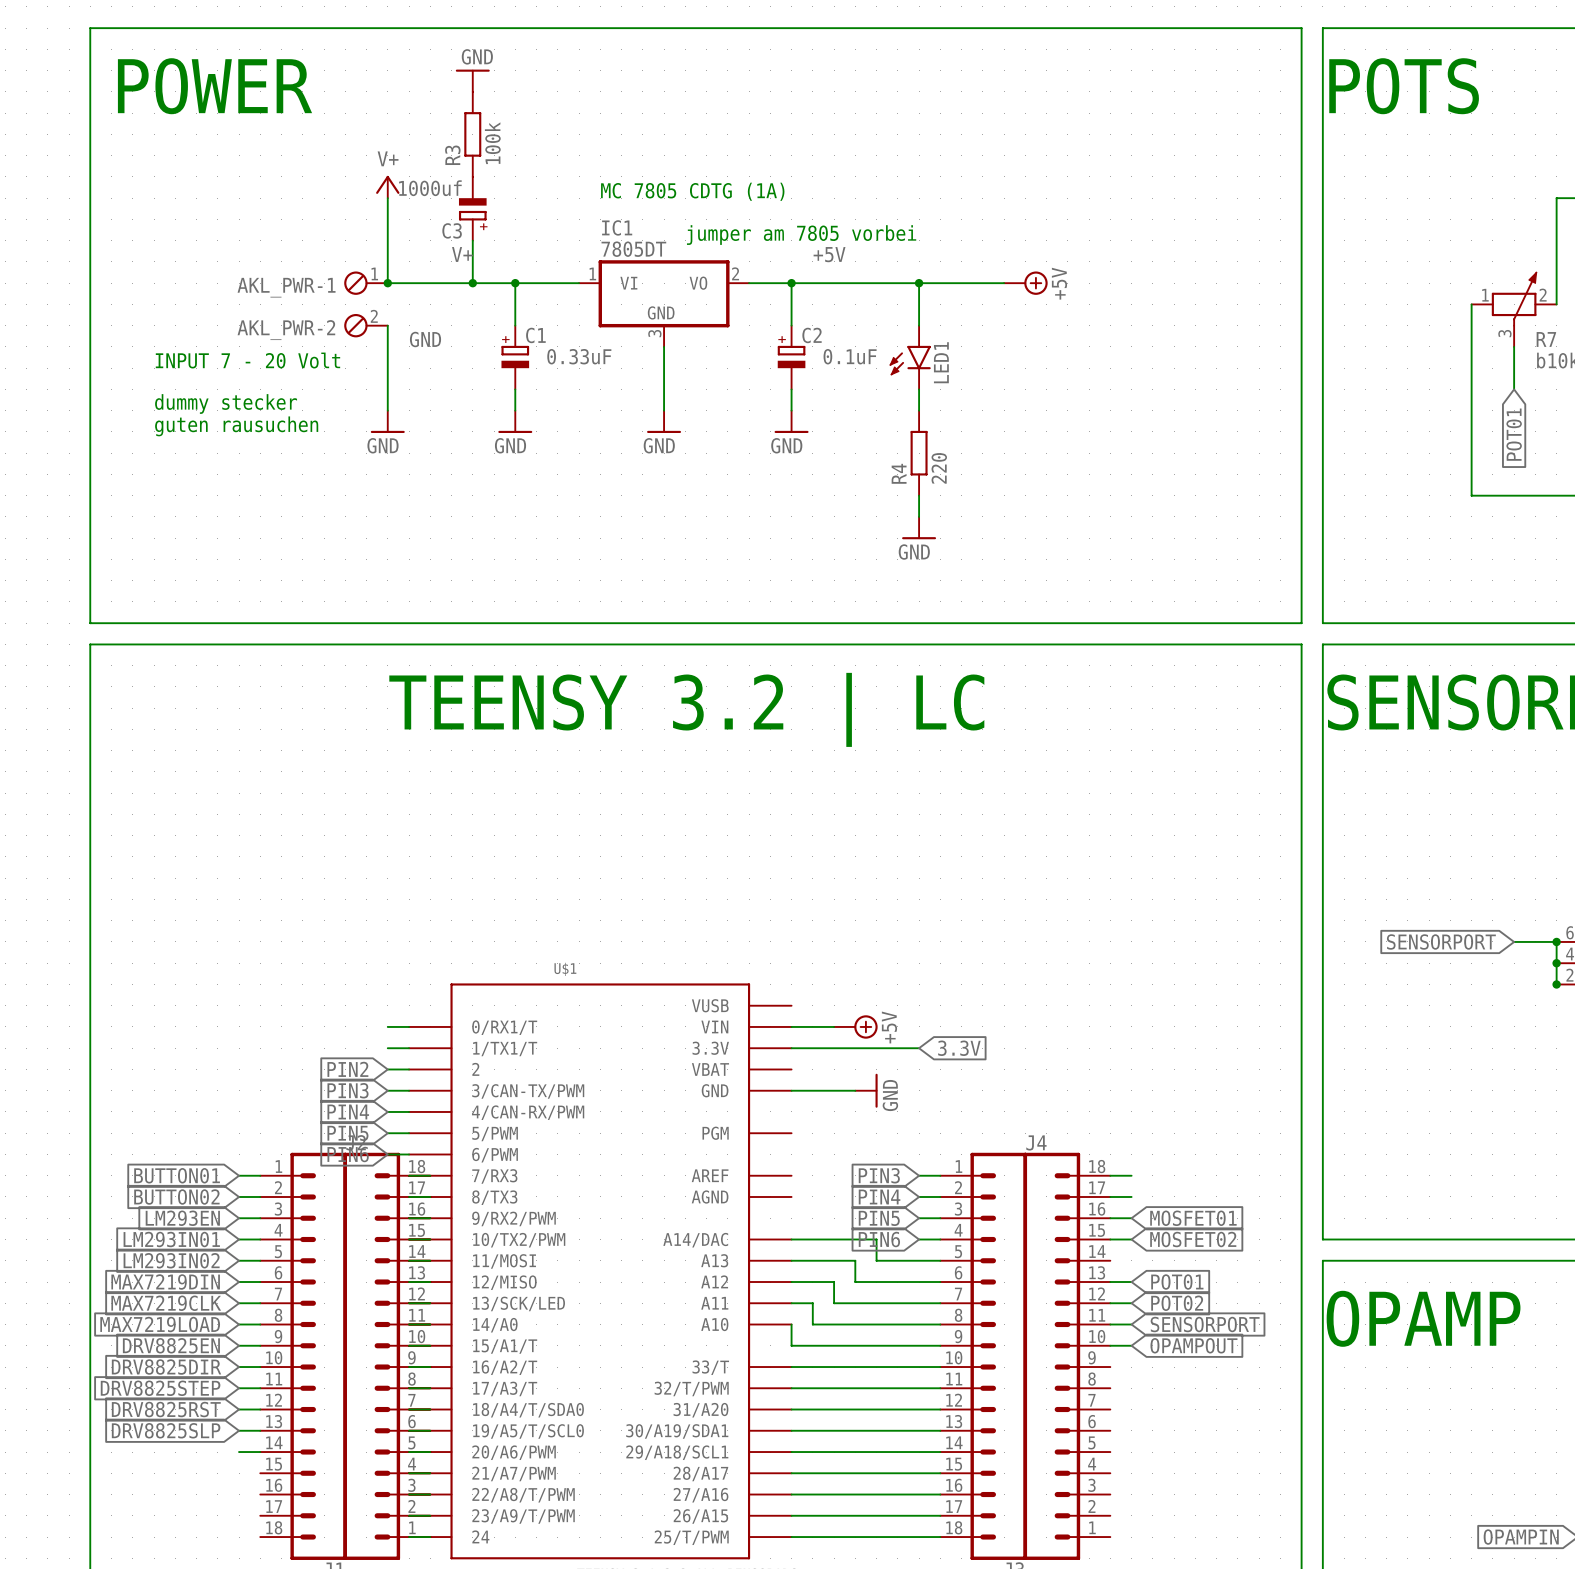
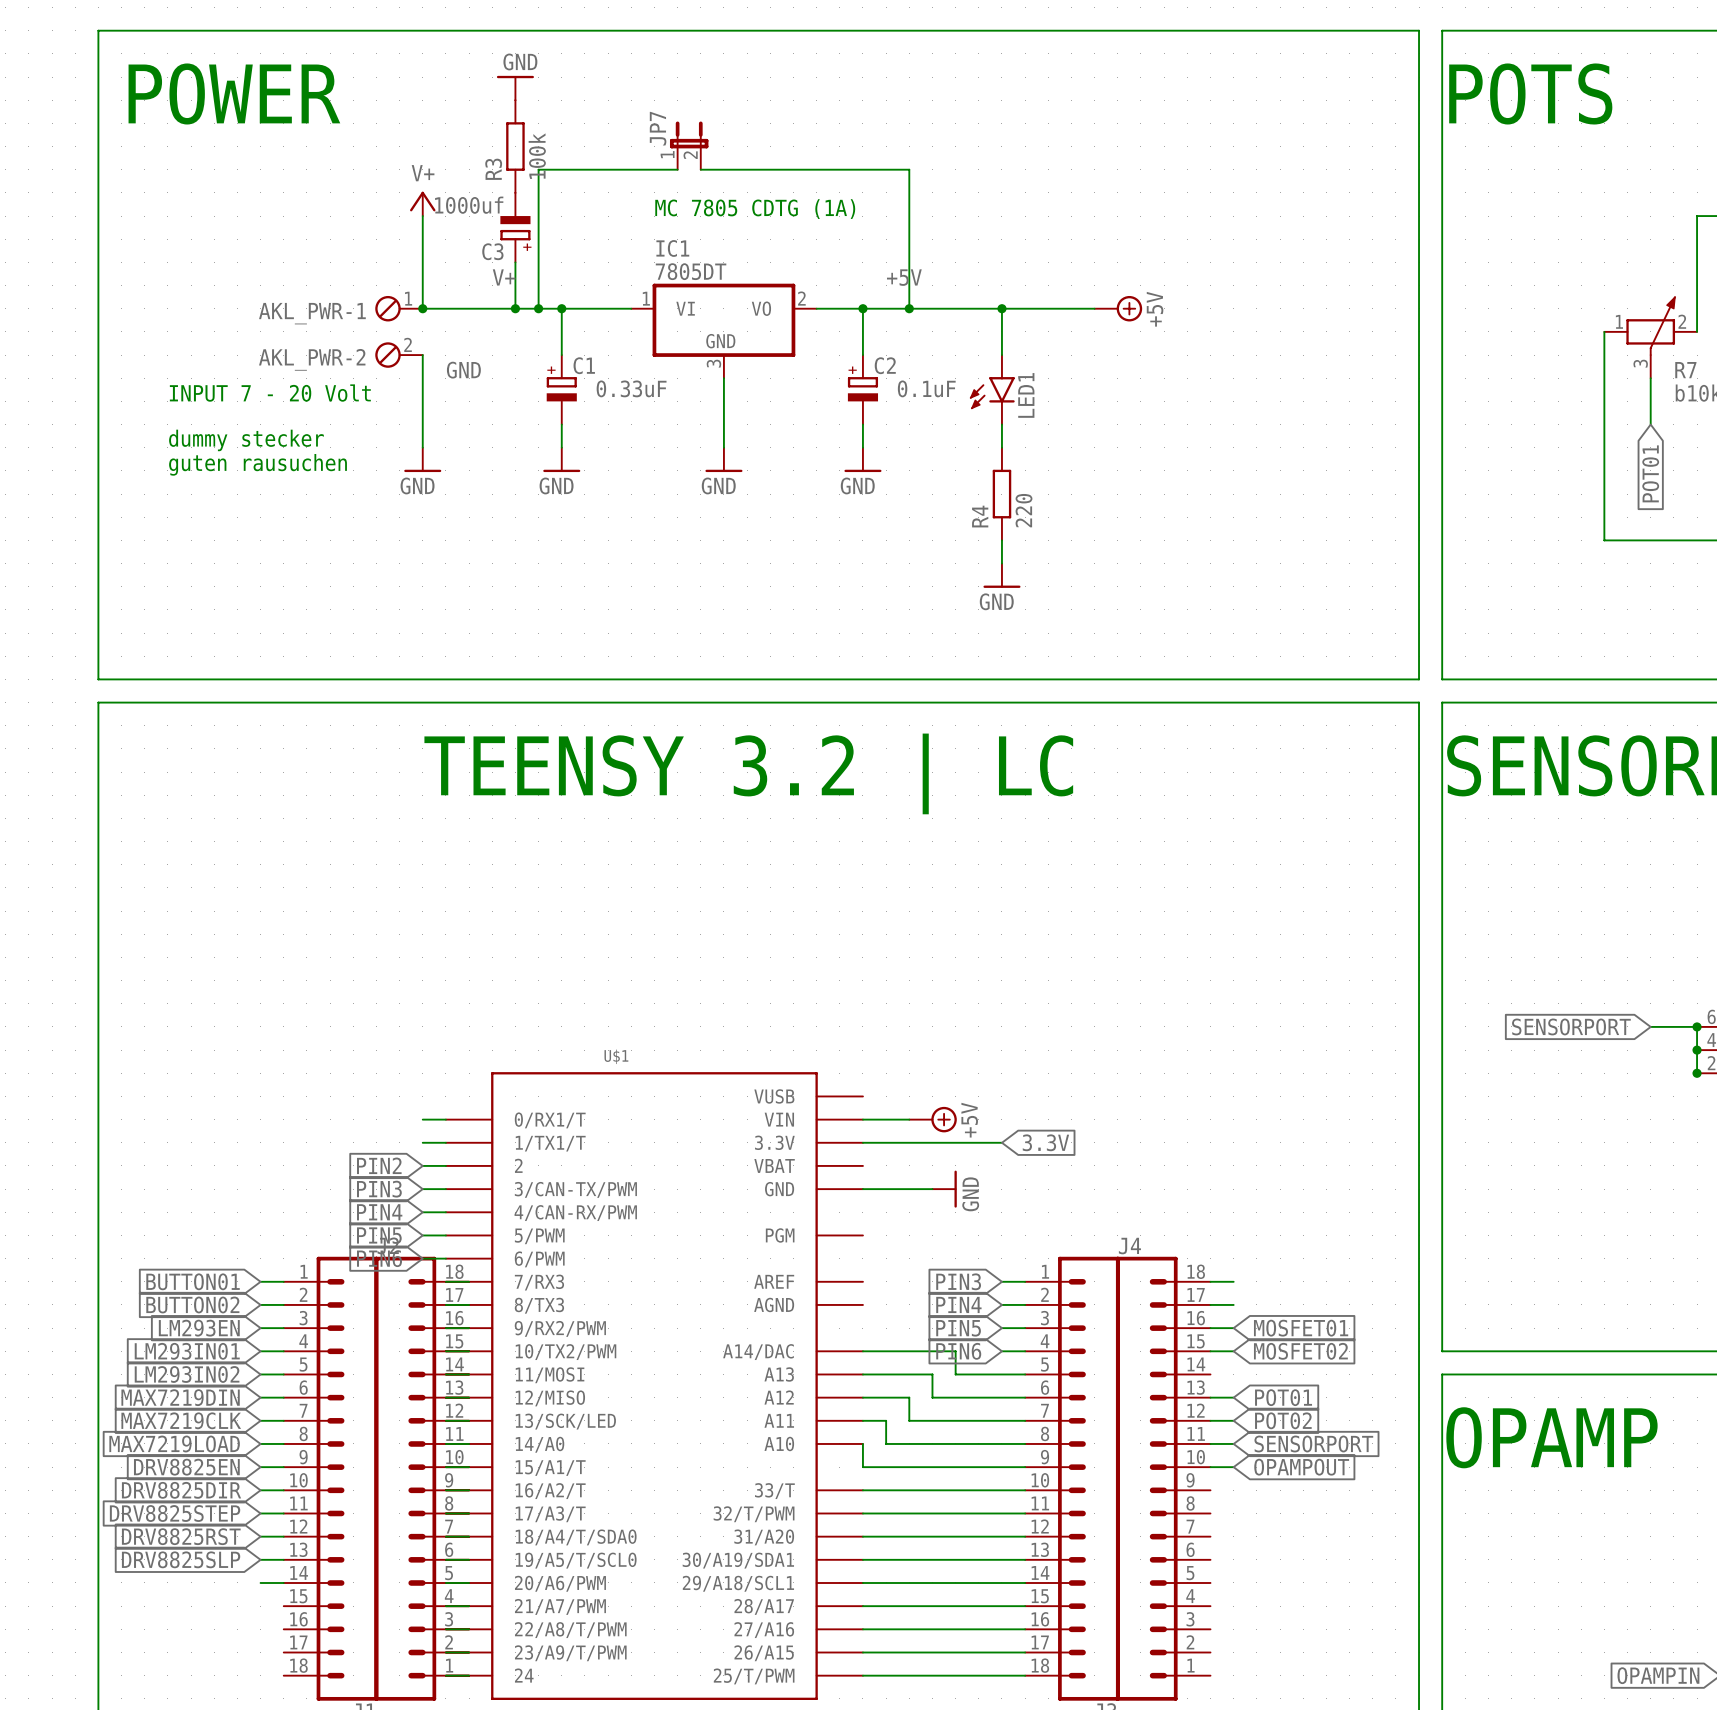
JP7: none -> (689, 145)
wire: none -> (677, 169) (538, 169) (538, 308)
wire: none -> (700, 169) (909, 169) (909, 308)
text: jumper am 7805 vorbei (801, 235) -> none
junction: none -> (538, 308)
junction: none -> (909, 308)

